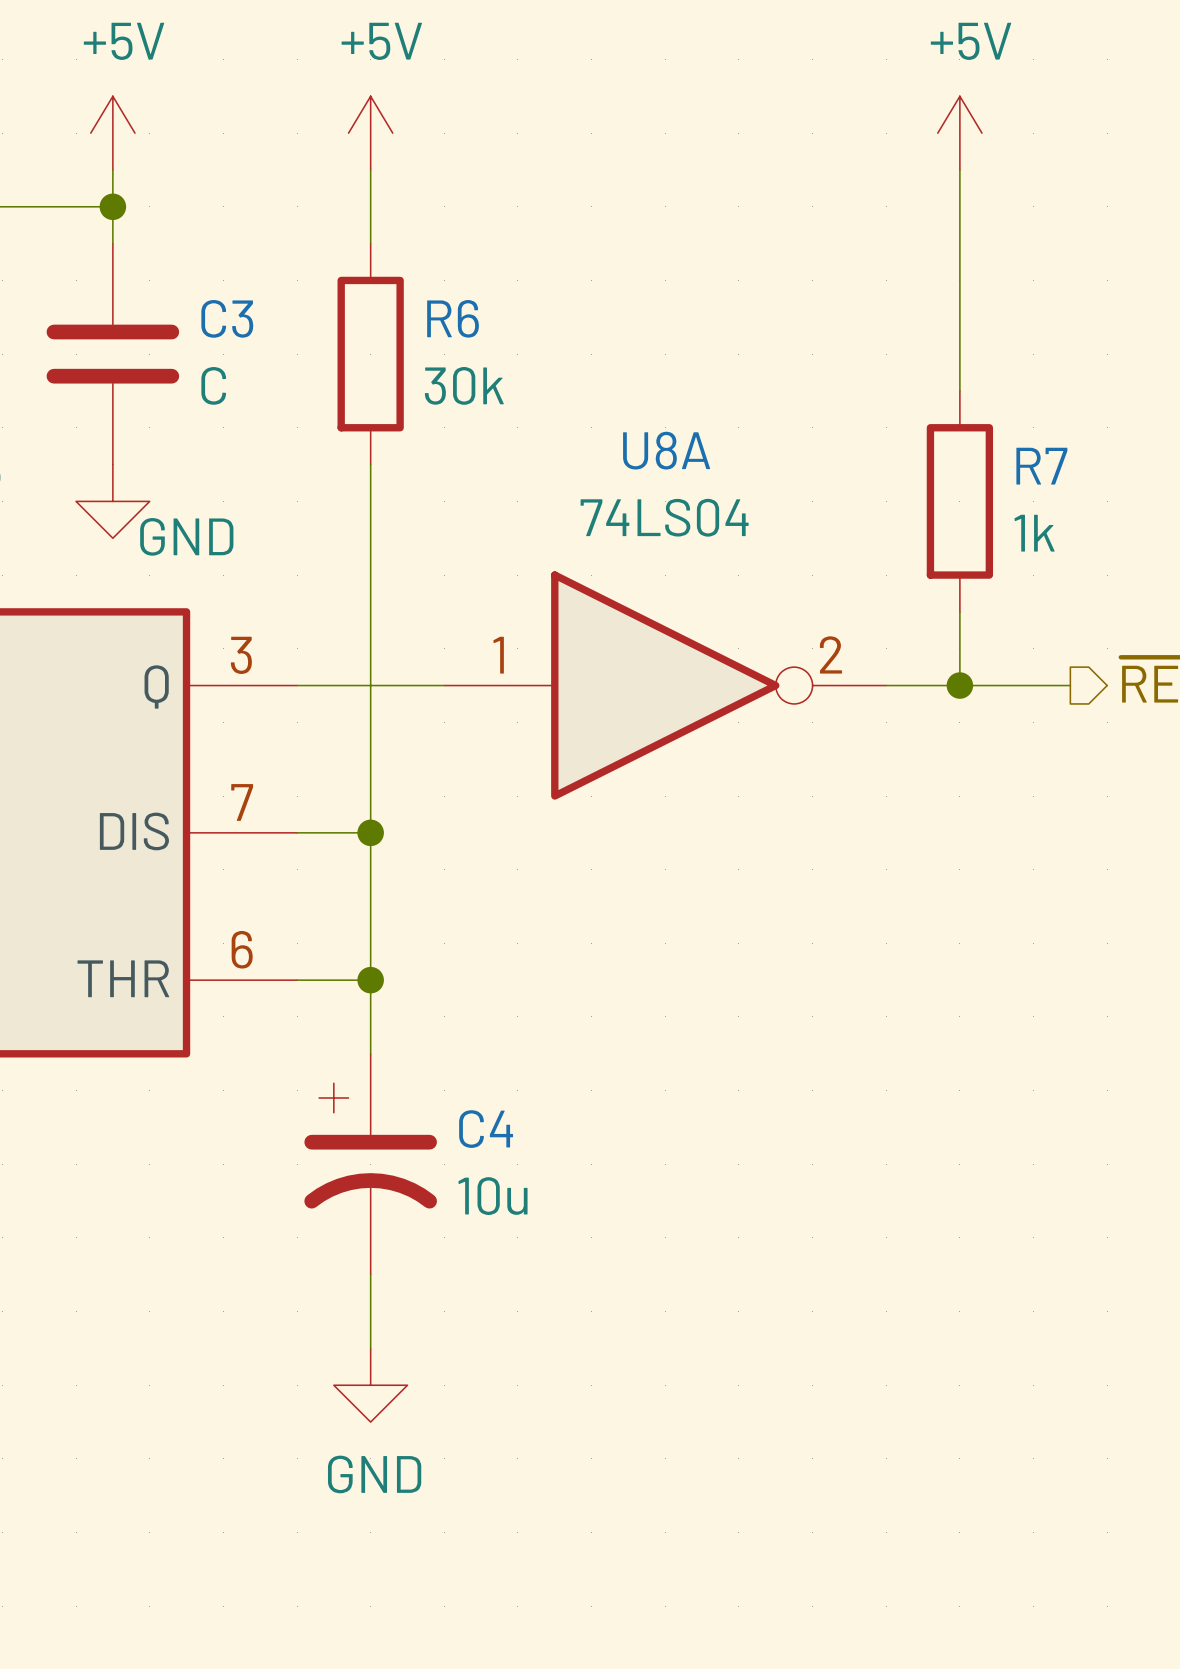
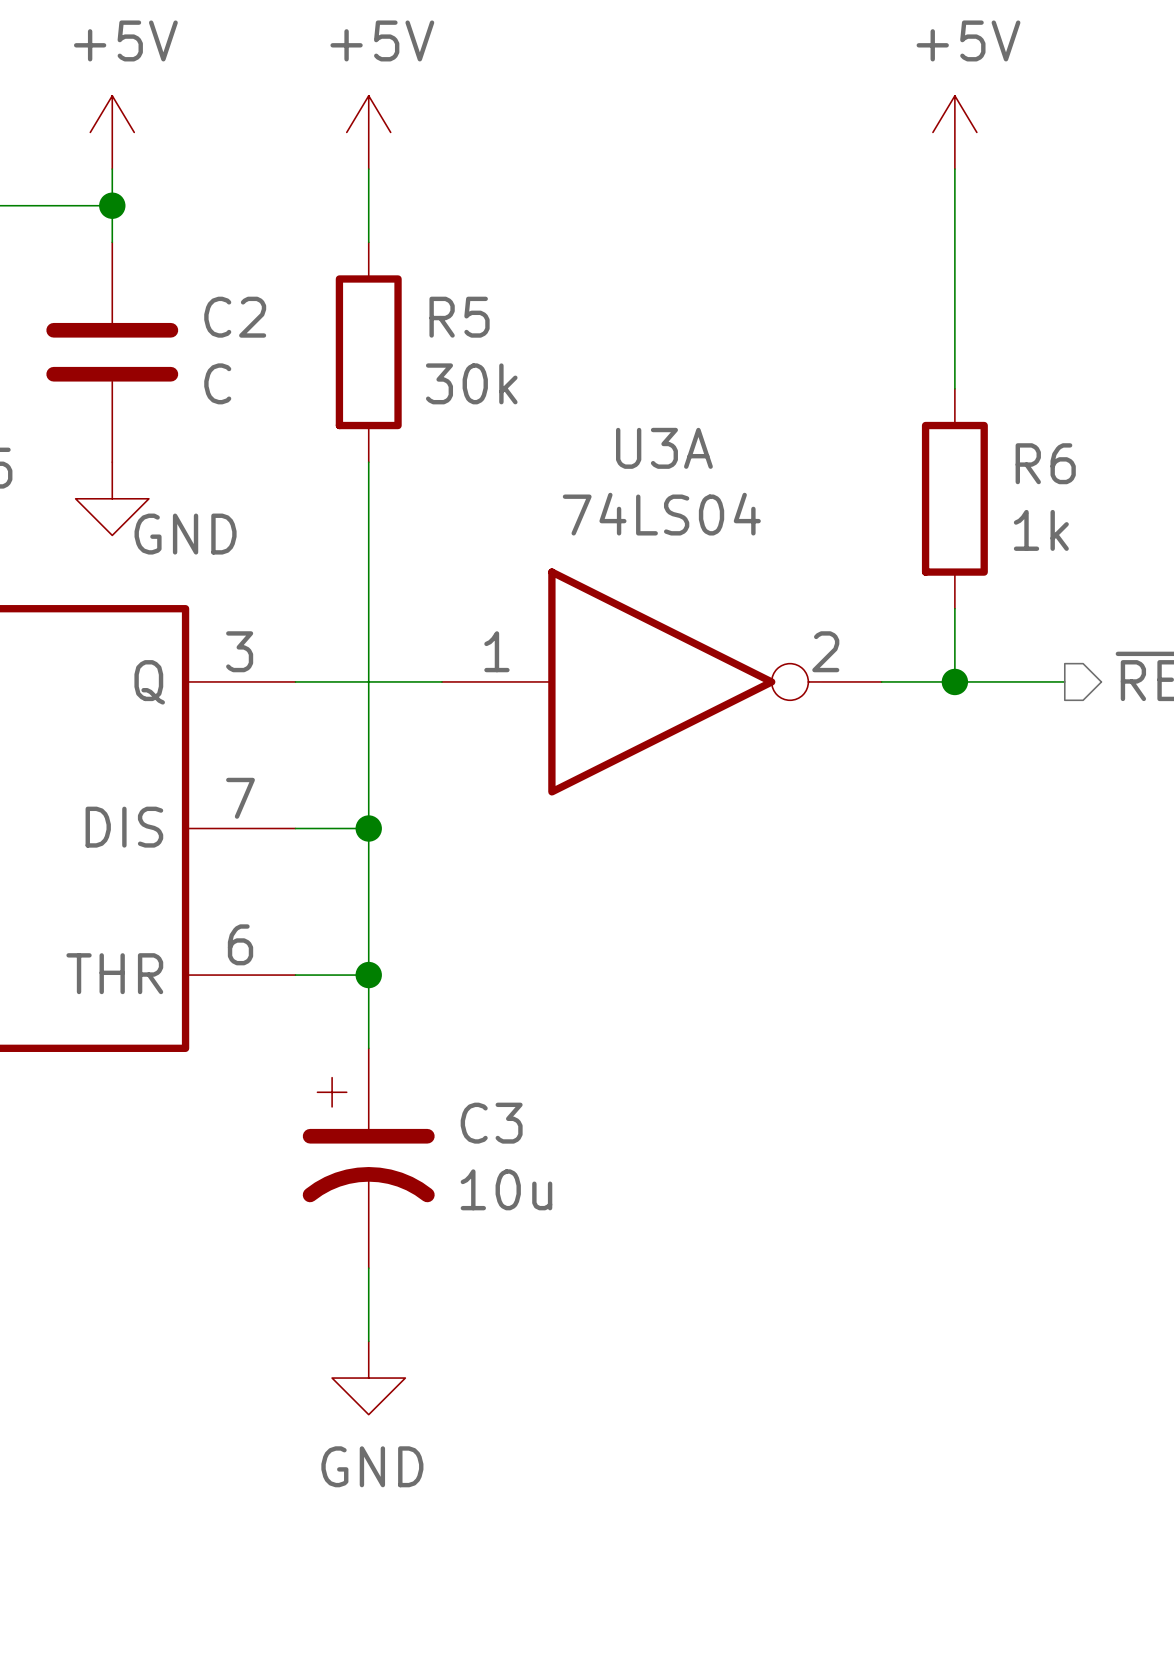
C3 name: C3 (227, 318) -> C2 (235, 317)
R6 name: R6 (453, 318) -> R5 (459, 317)
U8A name: U8A (666, 450) -> U3A (664, 448)
R7 name: R7 (1041, 466) -> R6 (1045, 463)
C4 name: C4 (486, 1129) -> C3 (491, 1123)

